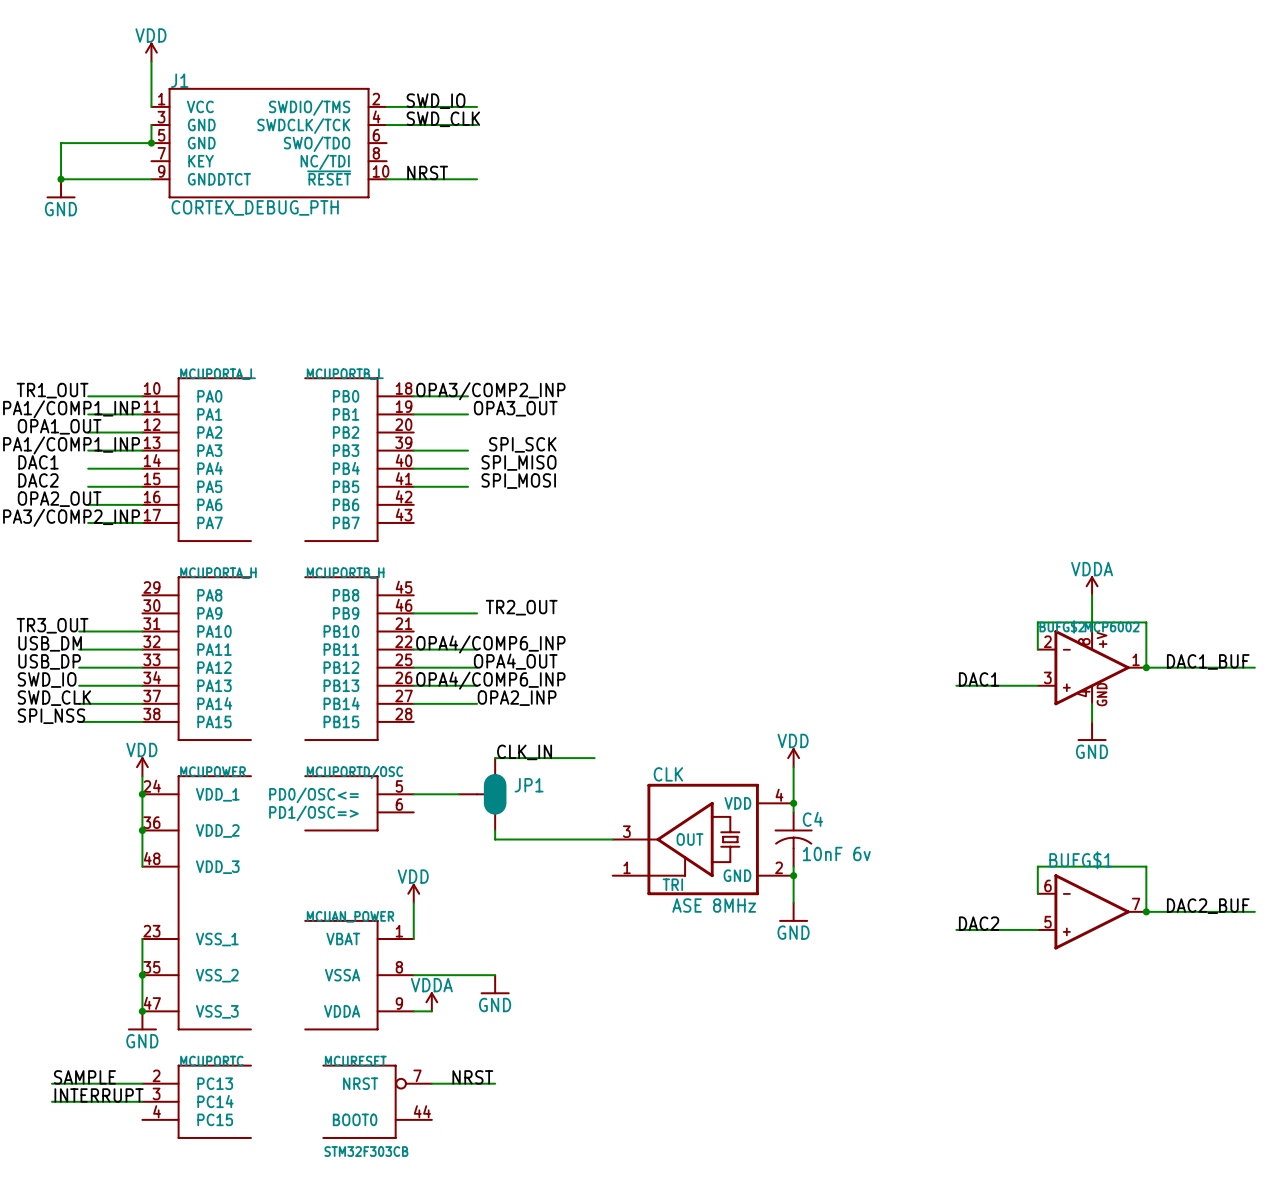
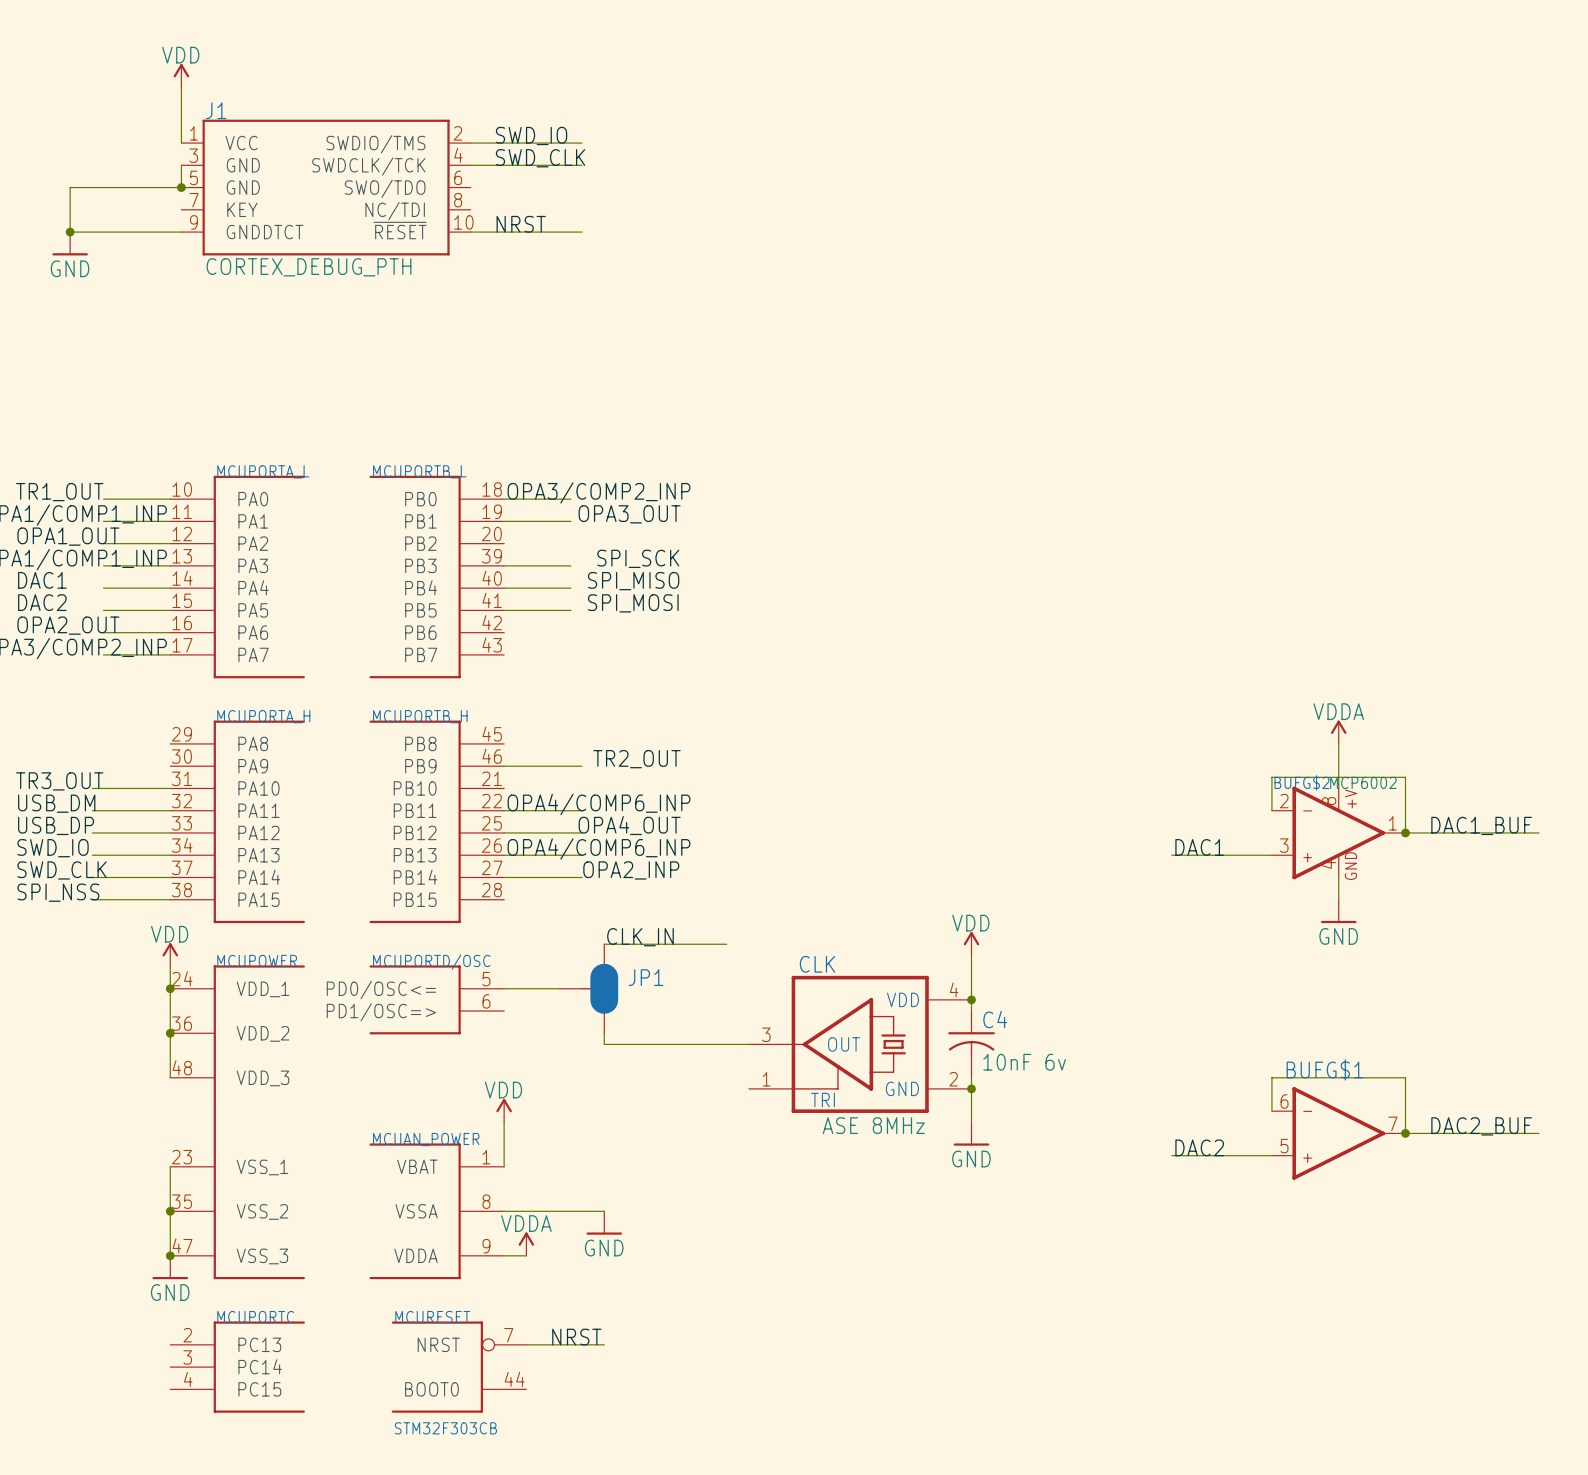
label: SAMPLE (84, 1077) -> none
wire: (51, 1083) (142, 1083) -> none
label: INTERRUPT (99, 1095) -> none
wire: (51, 1101) (142, 1101) -> none

